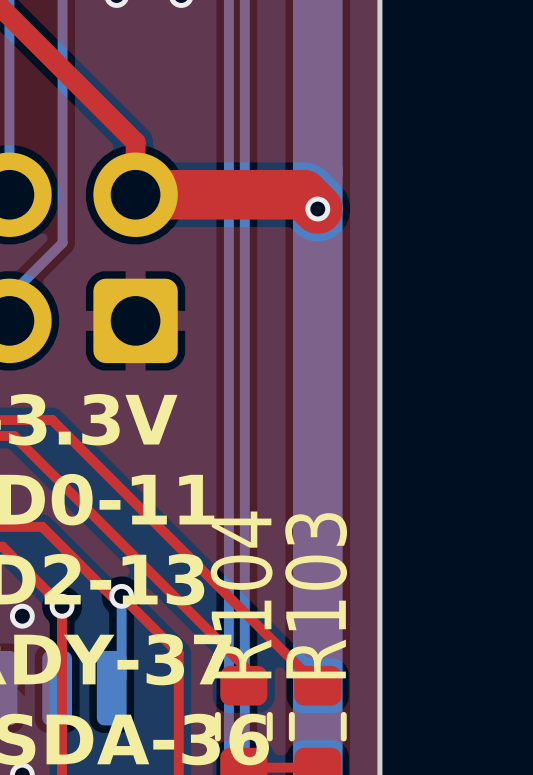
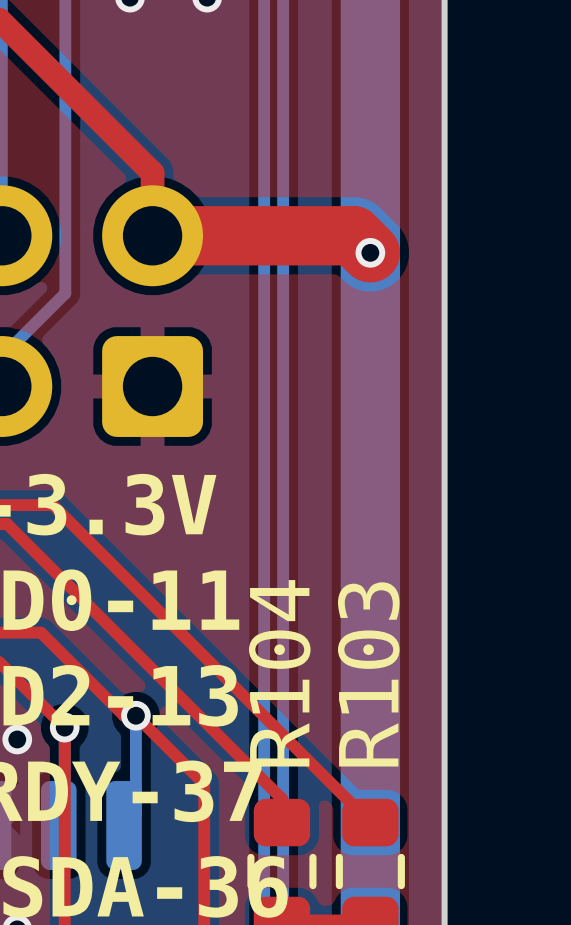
R104 name position: R104 (241, 594) -> R104 (279, 673)
R103 name position: R103 (316, 595) -> R103 (368, 674)

